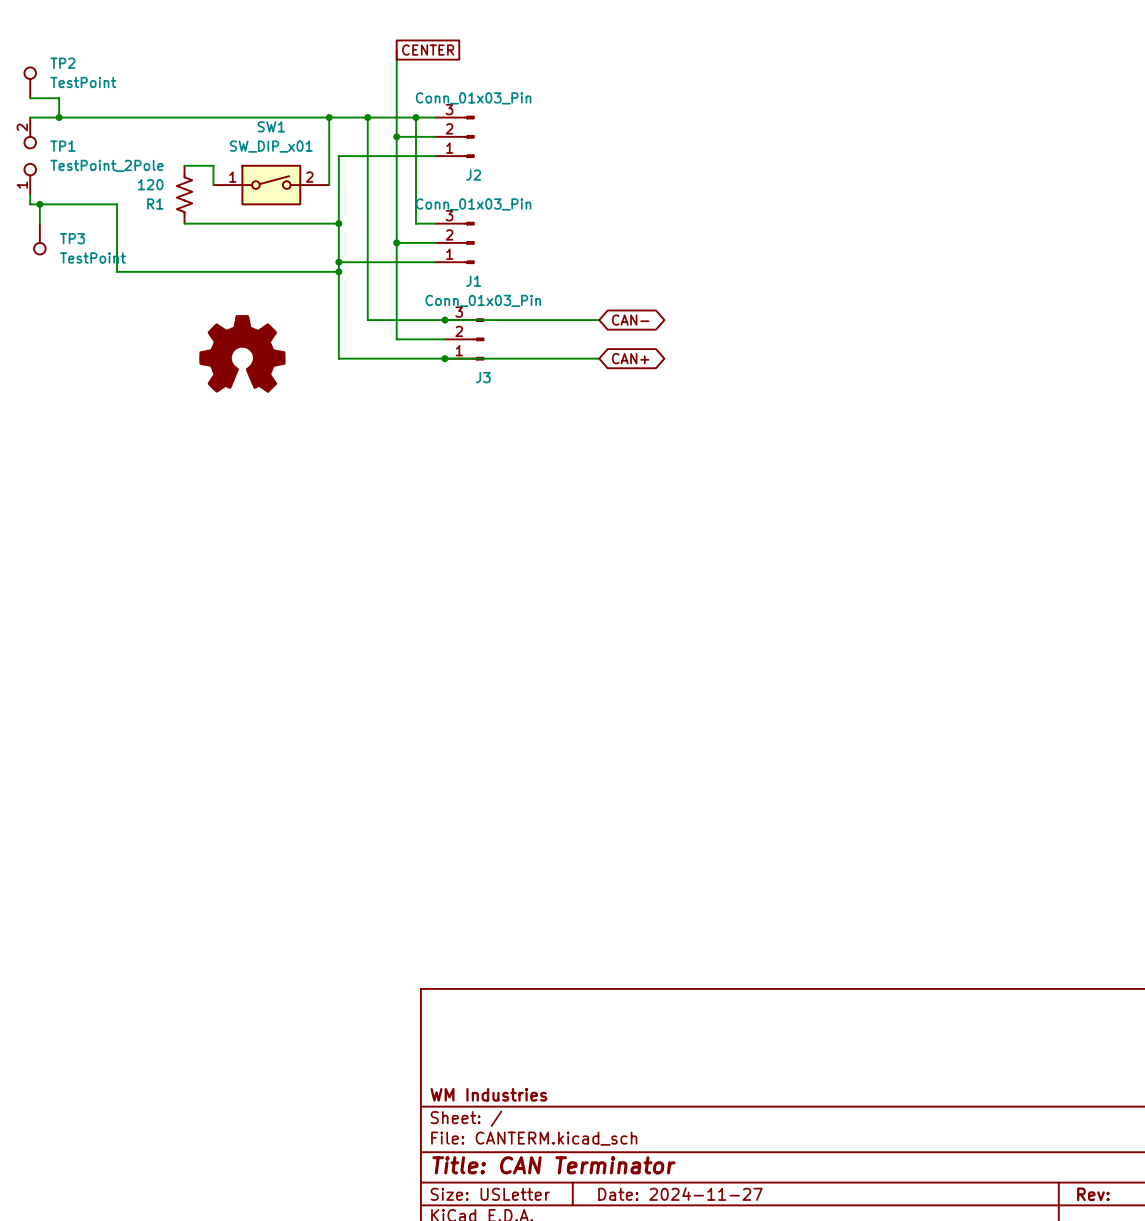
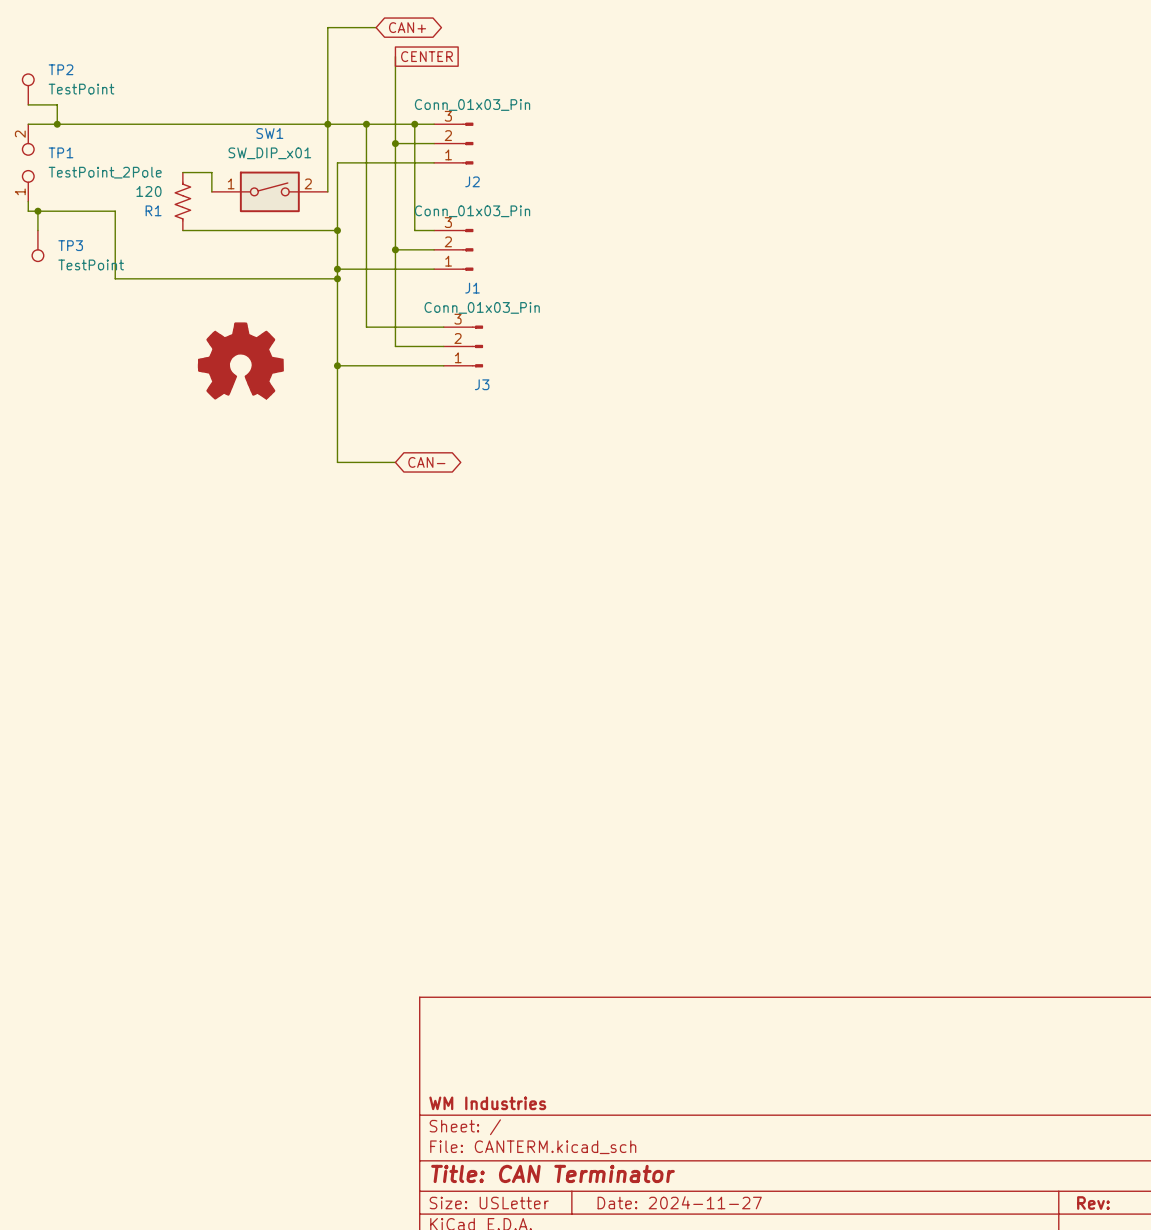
wire: none -> (376, 27) (327, 27) (327, 124)
global label: none -> CAN+ (407, 27)
wire: (444, 320) (599, 320) -> none
junction: (444, 320) -> none
global label: CAN- (630, 320) -> none
wire: none -> (337, 365) (337, 462) (395, 462)
junction: none -> (337, 365)
wire: (444, 358) (599, 358) -> none
junction: (444, 358) -> none
global label: CAN+ (630, 358) -> none
global label: none -> CAN- (426, 462)

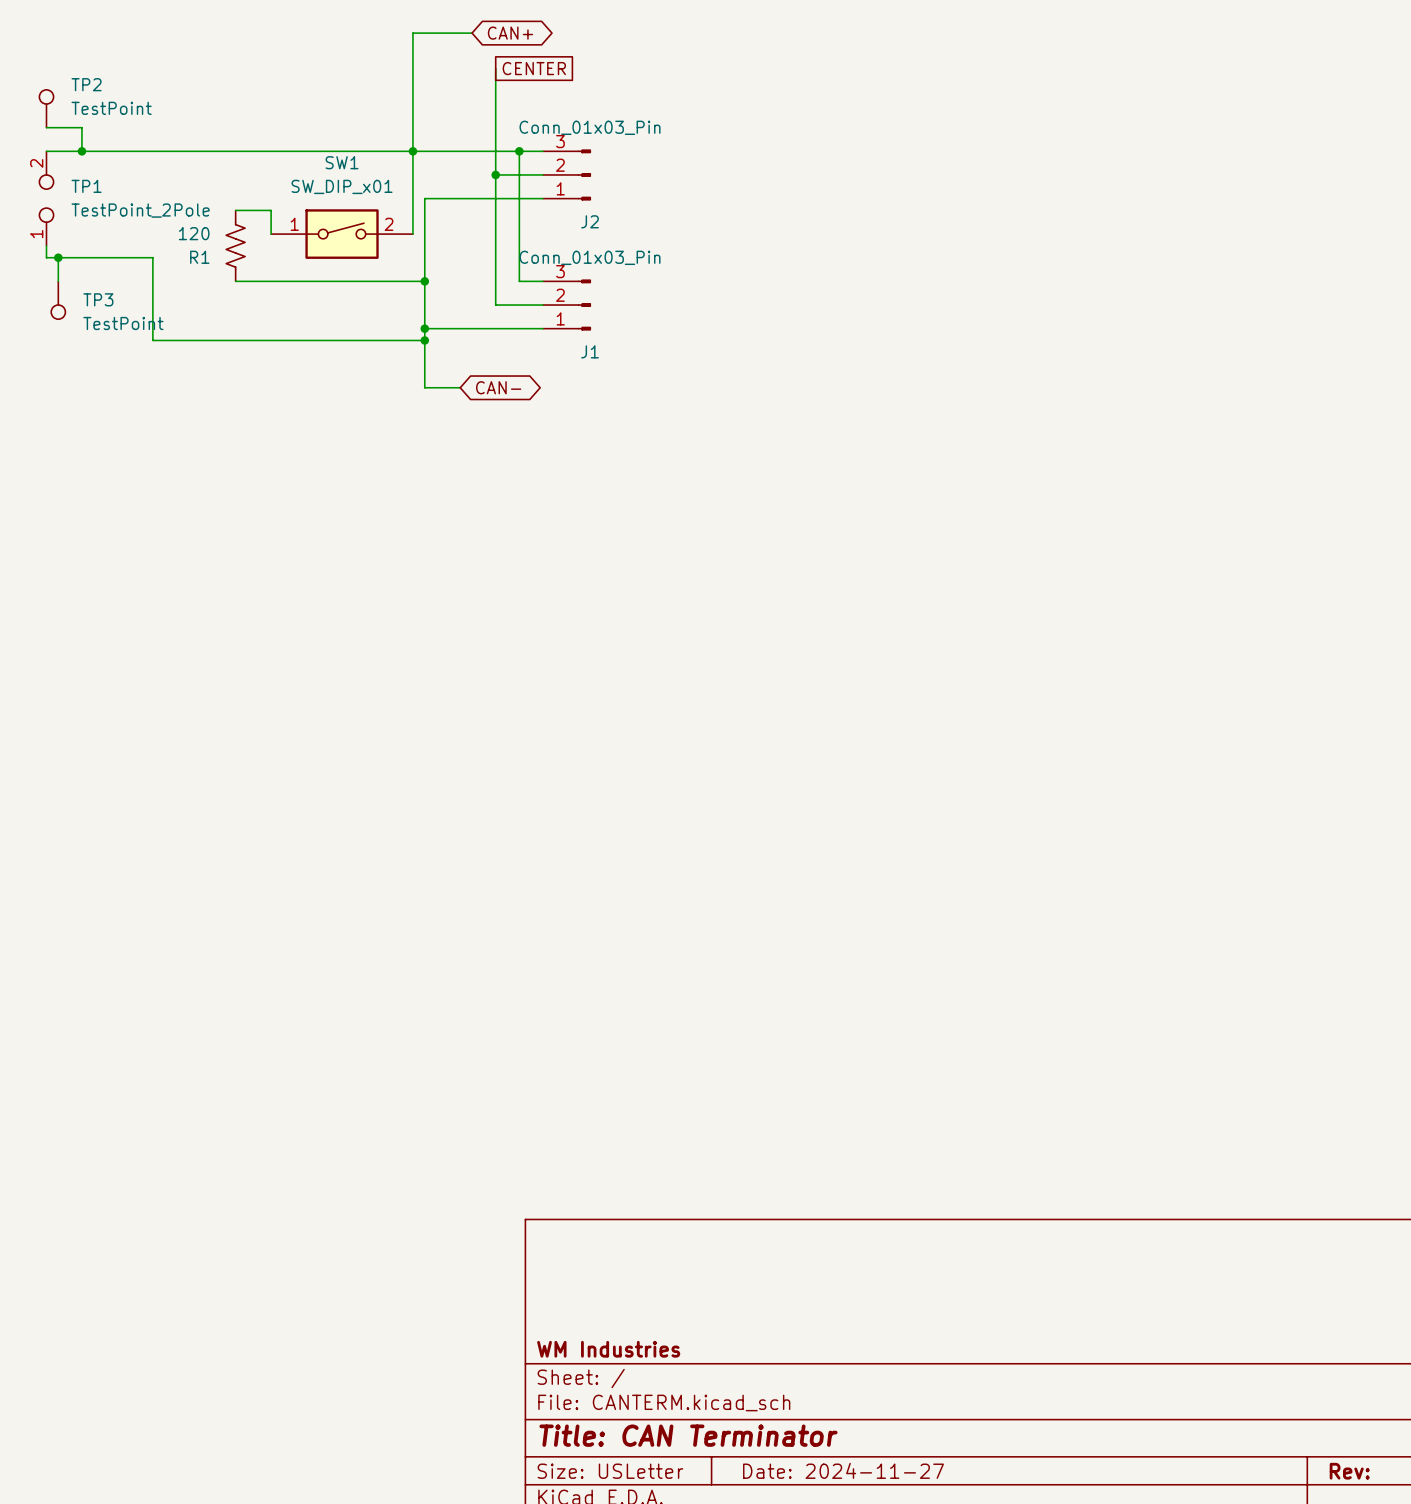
wire: (366, 124) (366, 327) (443, 327) -> none
junction: (366, 124) -> none
wire: (395, 249) (395, 346) (443, 346) -> none
junction: (395, 249) -> none
wire: (337, 317) (337, 462) (395, 462) -> (424, 387) (460, 387)
J3: Conn_01x03_Pin (463, 346) -> none
power symbol: (240, 360) -> none
wire: (337, 365) (443, 365) -> none
junction: (337, 365) -> none
global label position: CAN- (426, 462) -> CAN- (498, 387)

